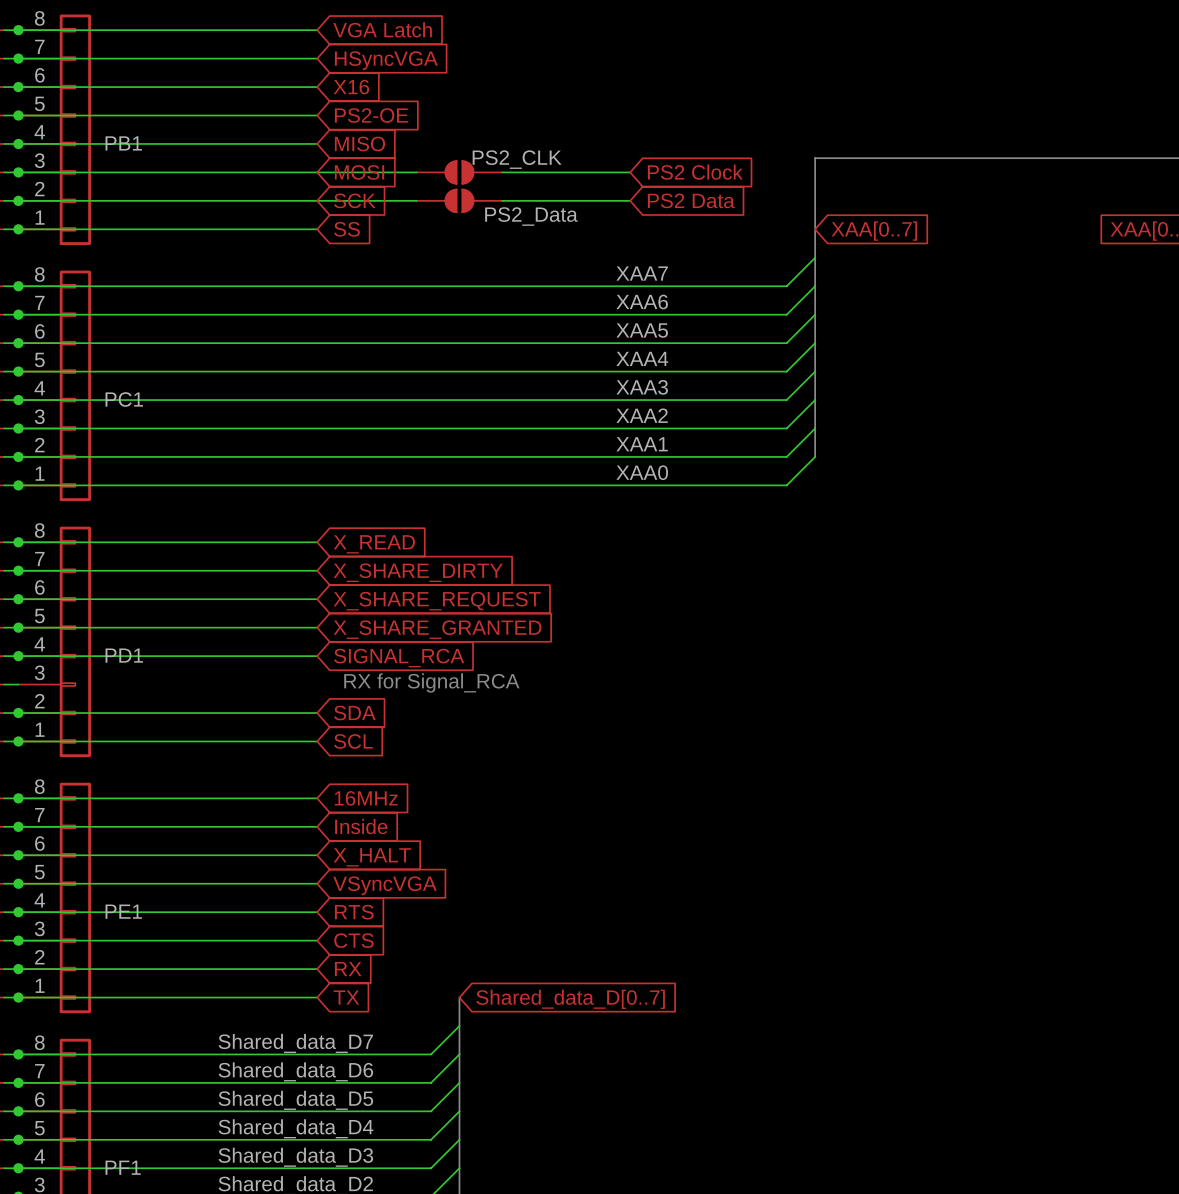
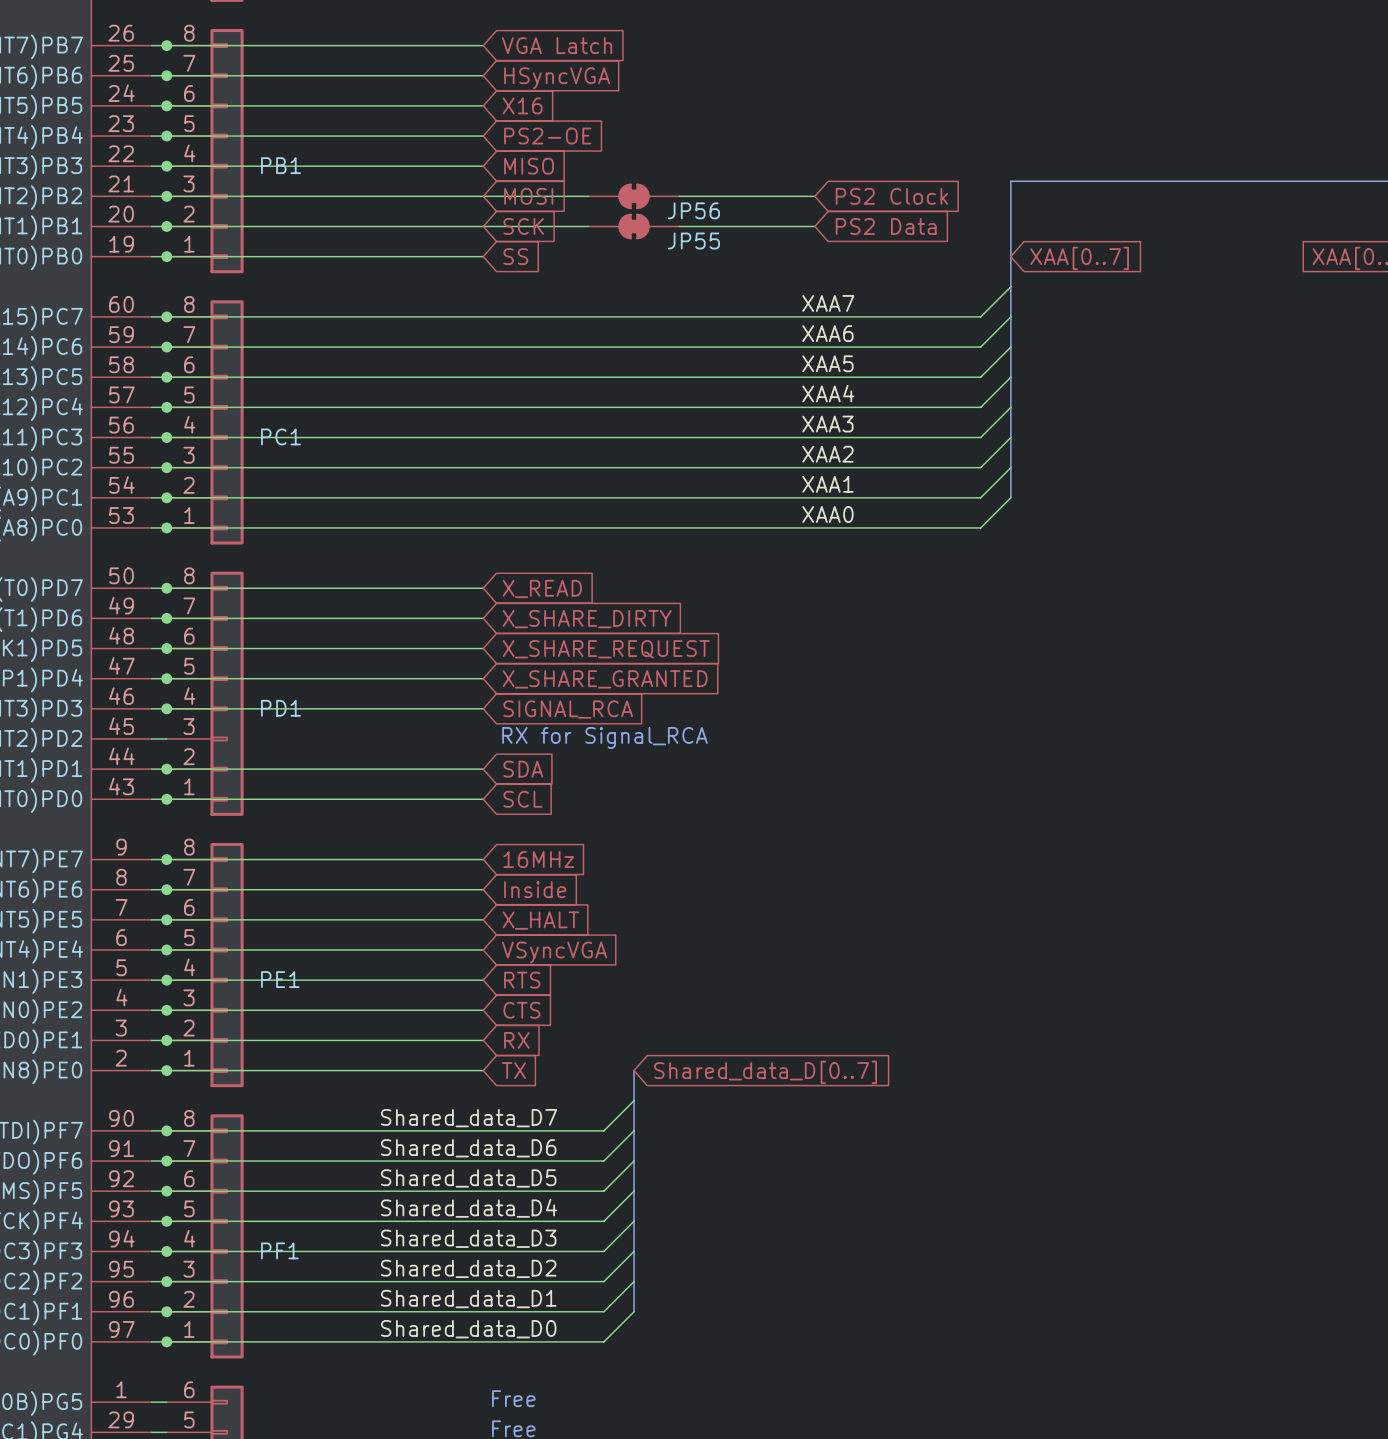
part: PS2_CLK (459, 172) -> none
JP56: none -> (634, 196)
part: PS2_Data (459, 200) -> none
JP55: none -> (634, 226)

